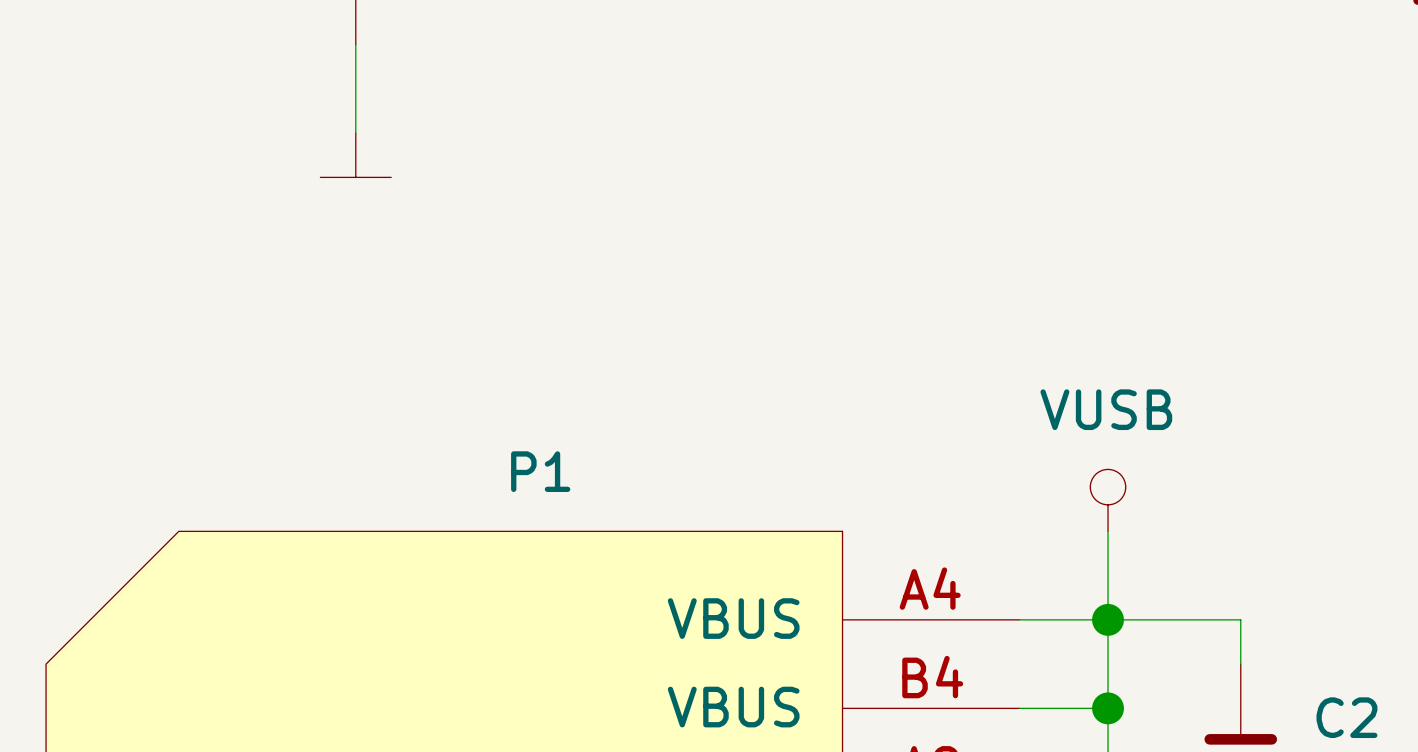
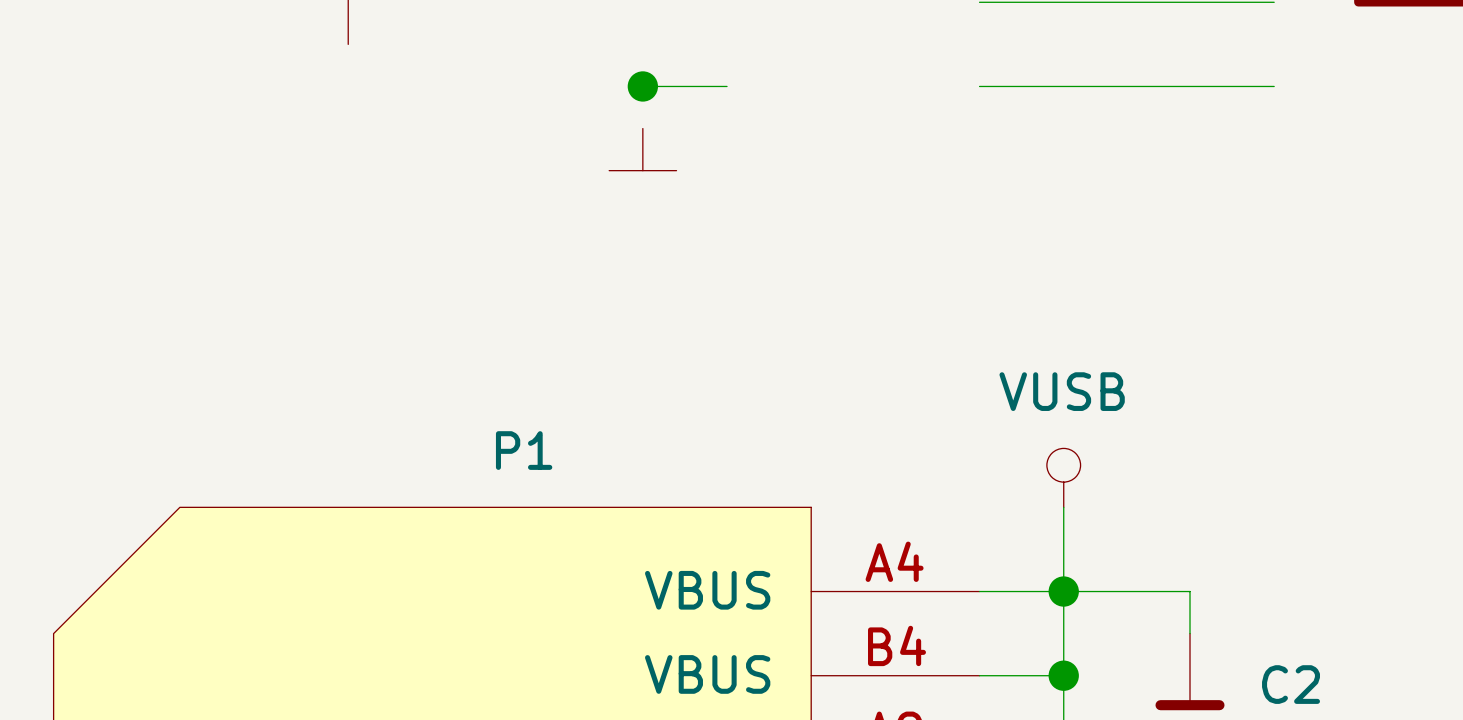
wire: none -> (979, 2) (1274, 2)
wire: (355, 44) (355, 133) -> none
wire: none -> (642, 86) (727, 86)
junction: none -> (642, 86)
wire: none -> (979, 86) (1274, 86)
power symbol: (355, 155) -> none
power symbol: none -> (642, 149)

